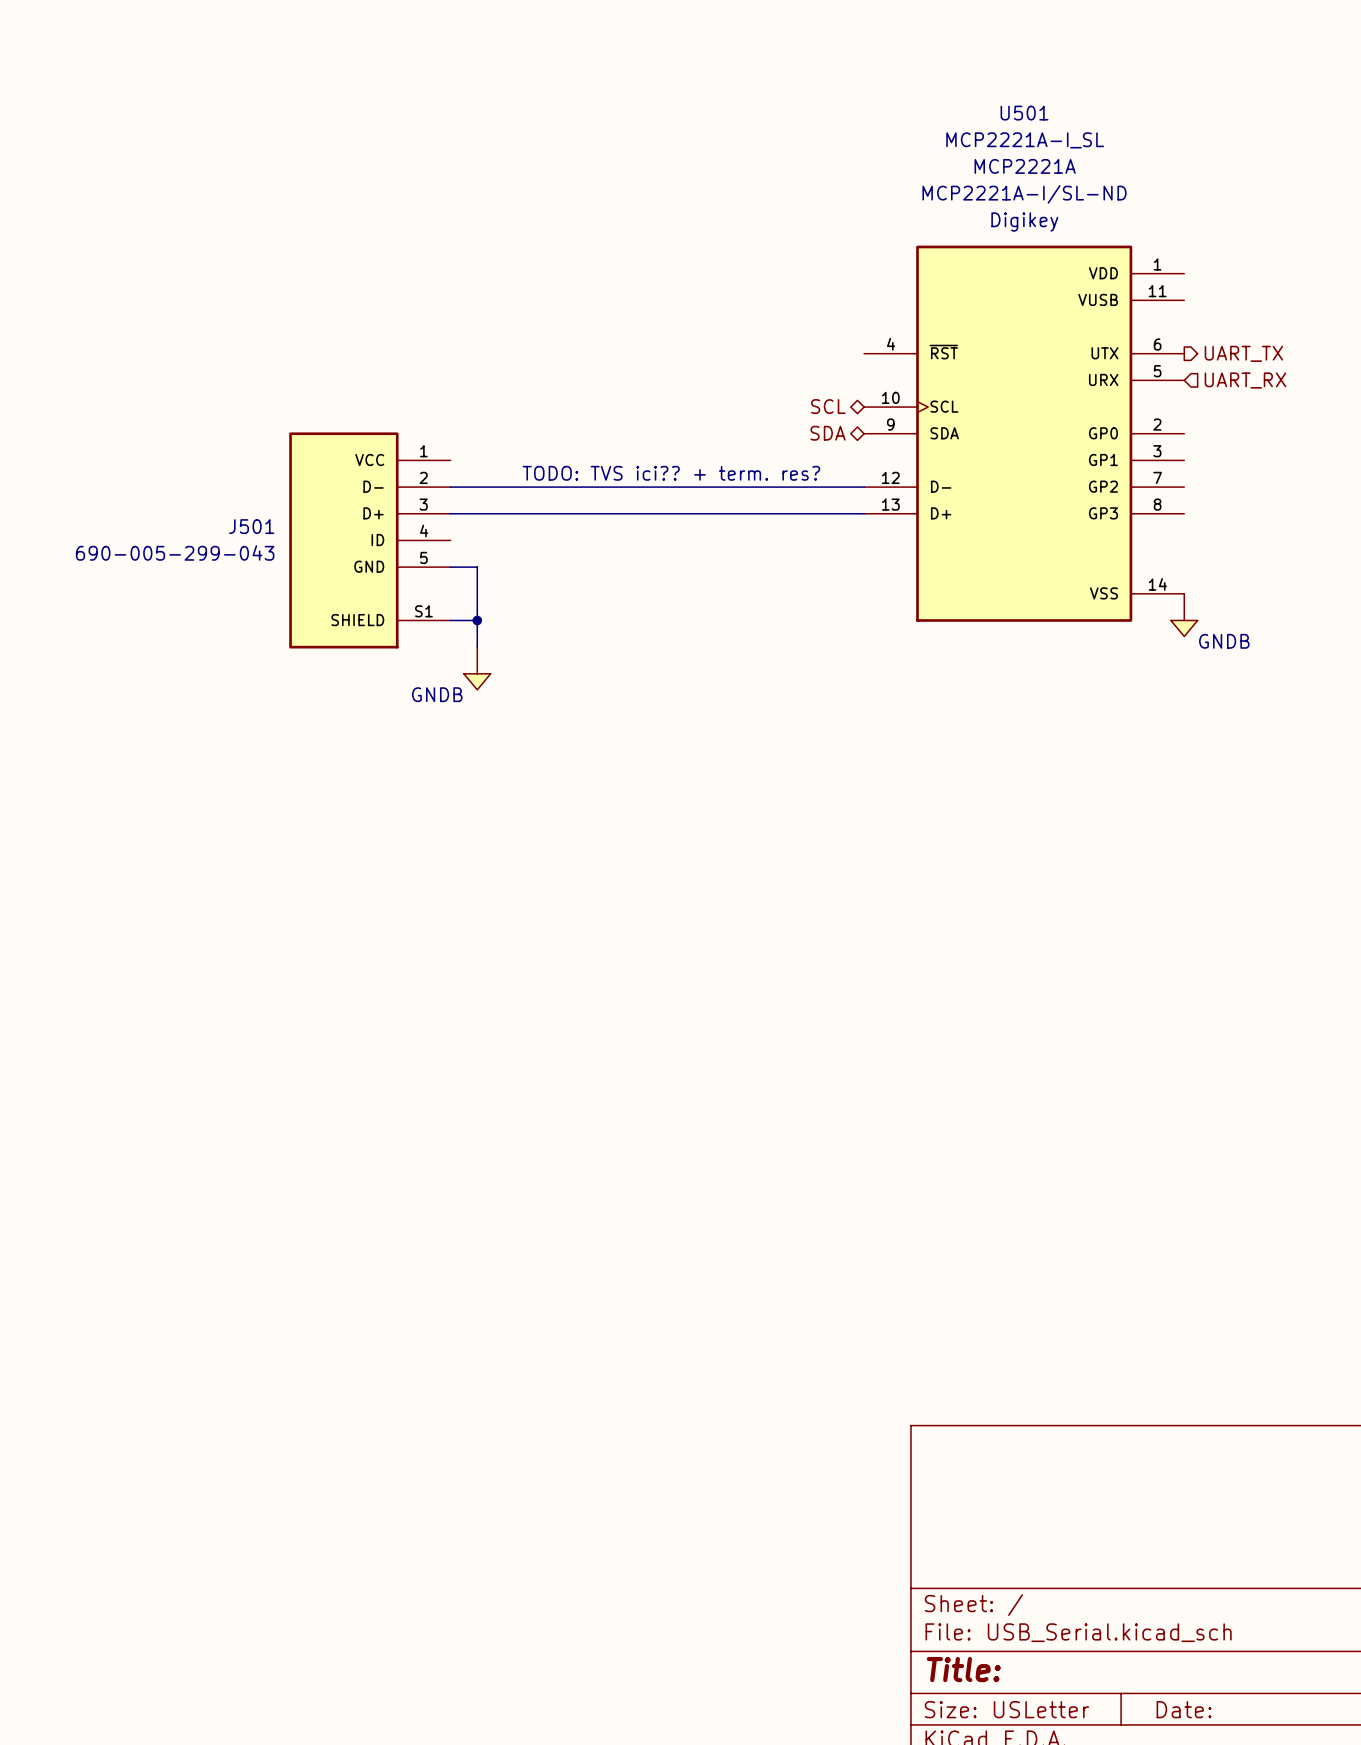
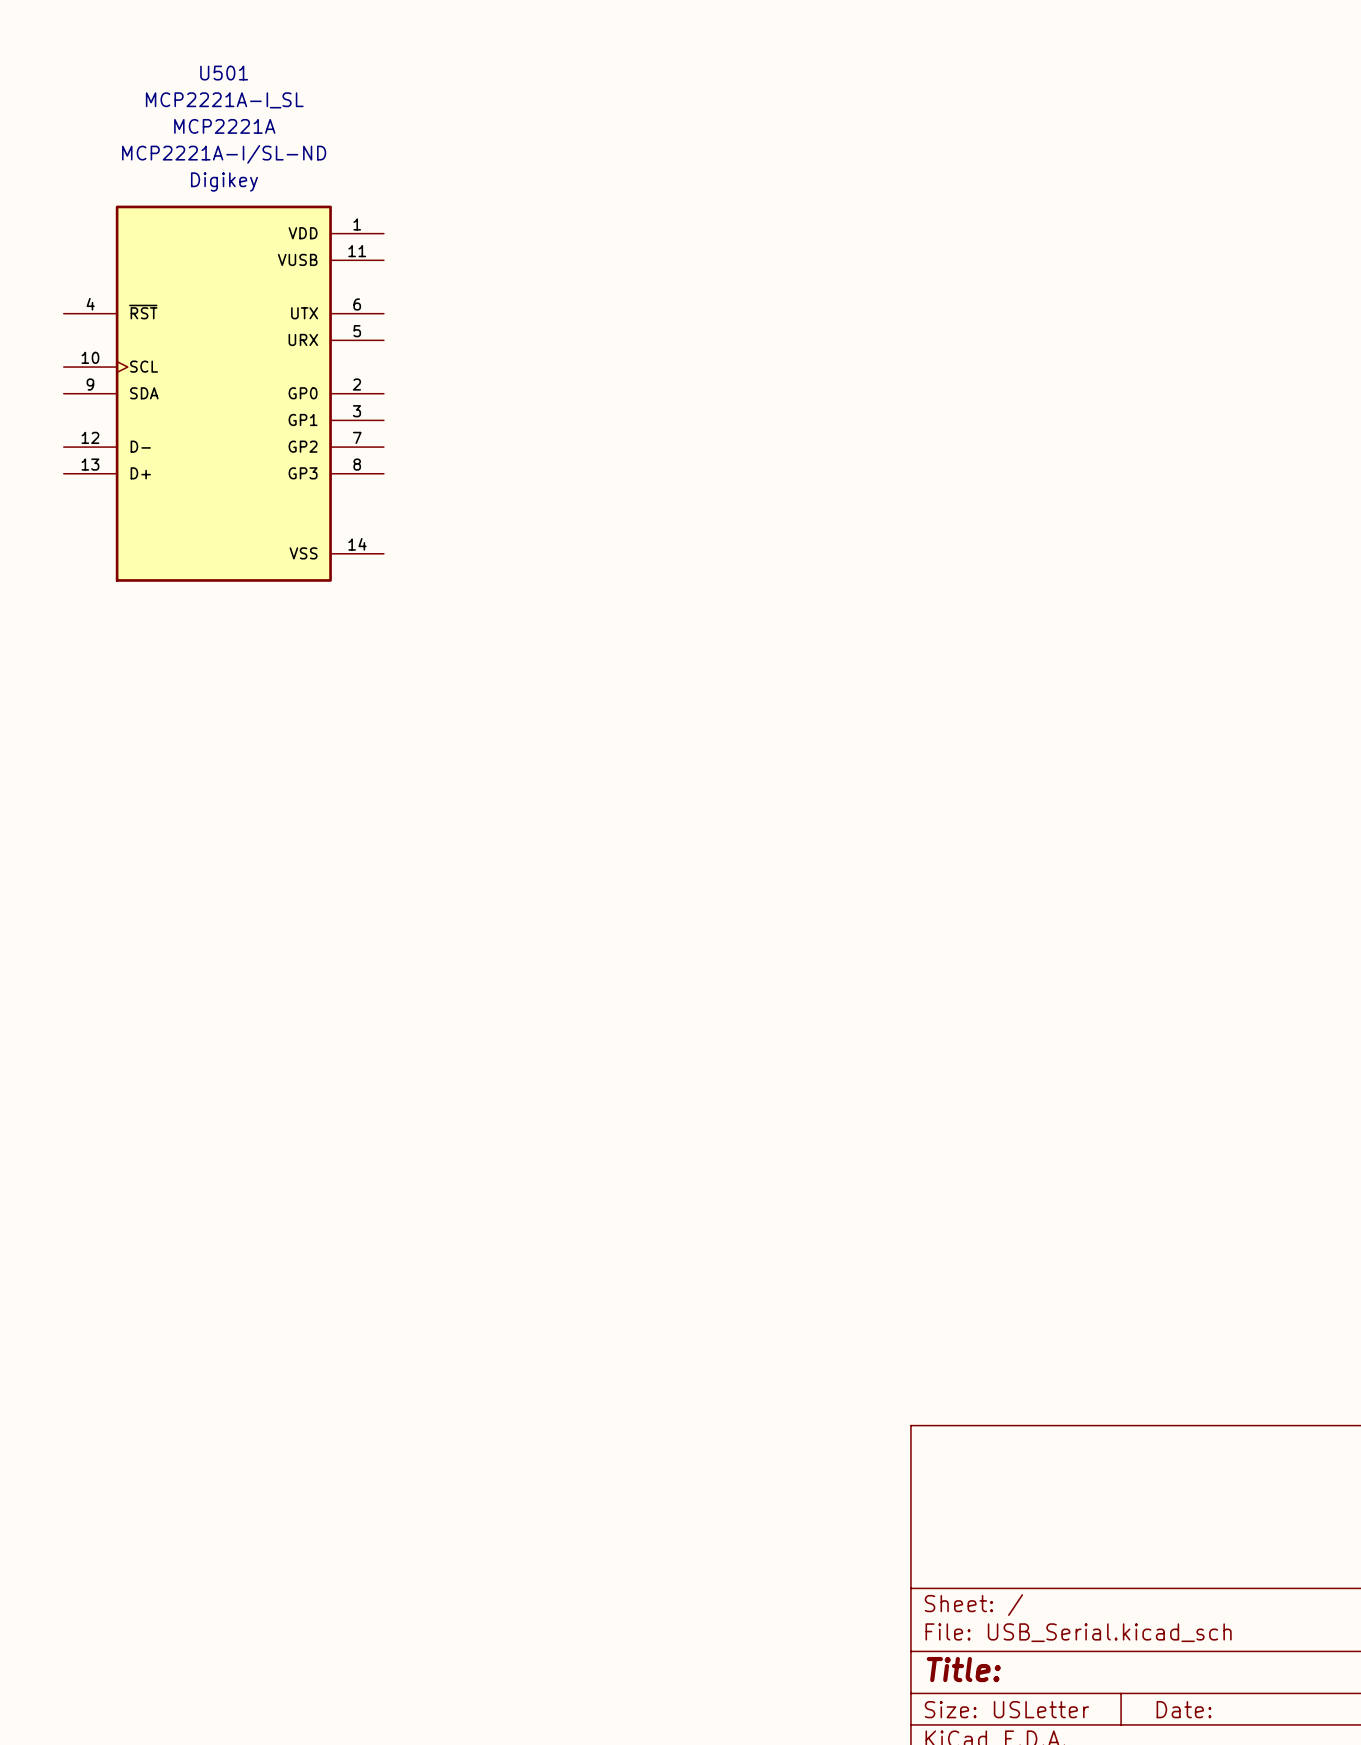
hierarchical label: UART_TX (1243, 353) -> none
hierarchical label: UART_RX (1245, 380) -> none
hierarchical label: SCL (828, 406) -> none
hierarchical label: SDA (828, 433) -> none
U501 position: (1024, 433) -> (223, 393)
text: TODO: TVS ici?? + term. res? (671, 473) -> none
wire: (450, 487) (864, 487) -> none
wire: (450, 513) (864, 513) -> none
J501: 690-005-299-043 (369, 540) -> none
wire: (450, 567) (477, 567) (477, 647) -> none
power symbol: GNDB (1184, 615) -> none
wire: (450, 620) (477, 620) -> none
junction: (477, 620) -> none
power symbol: GNDB (477, 668) -> none

